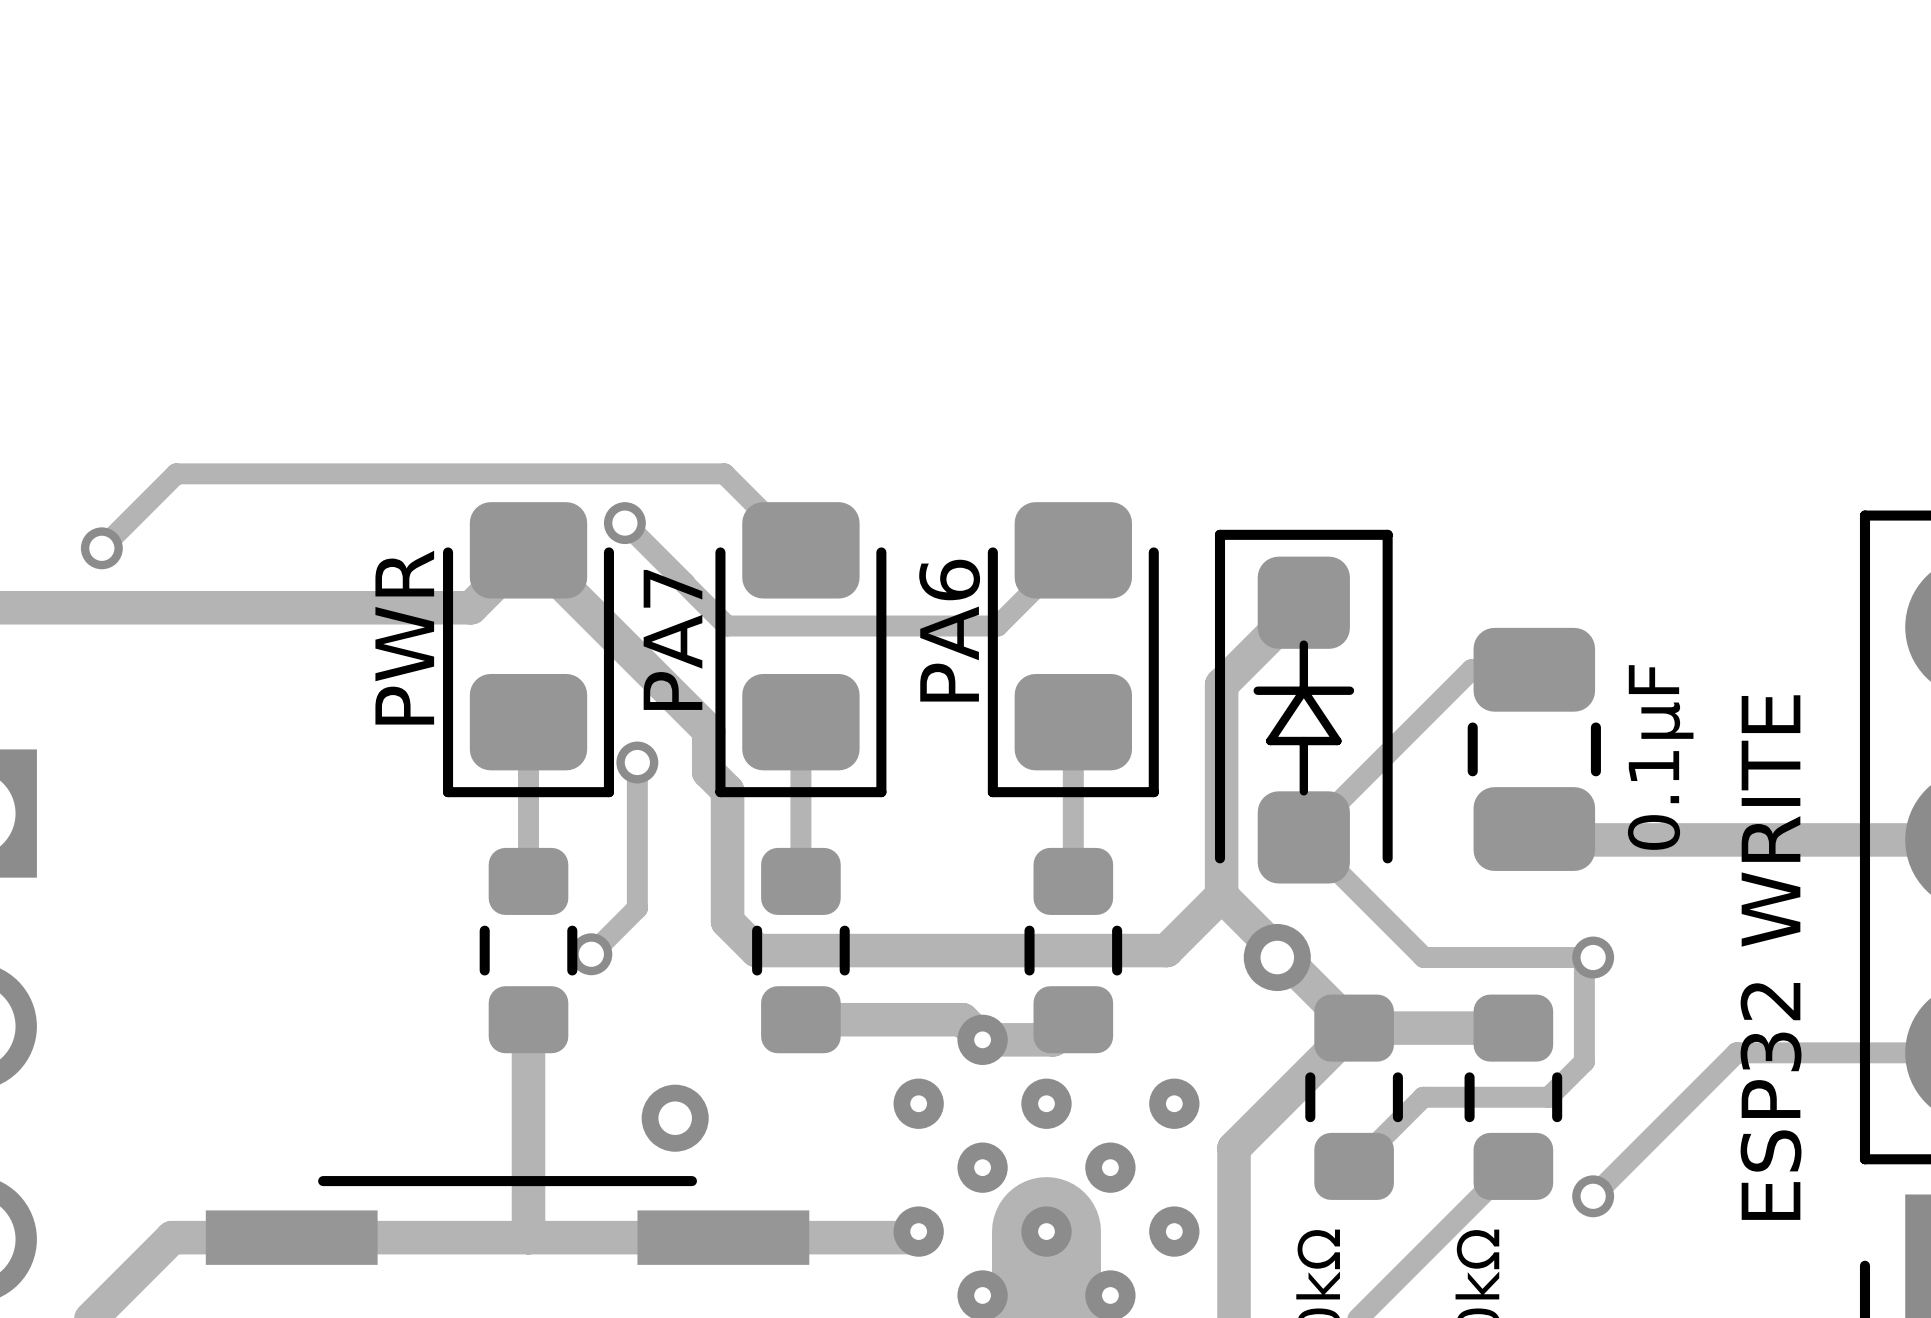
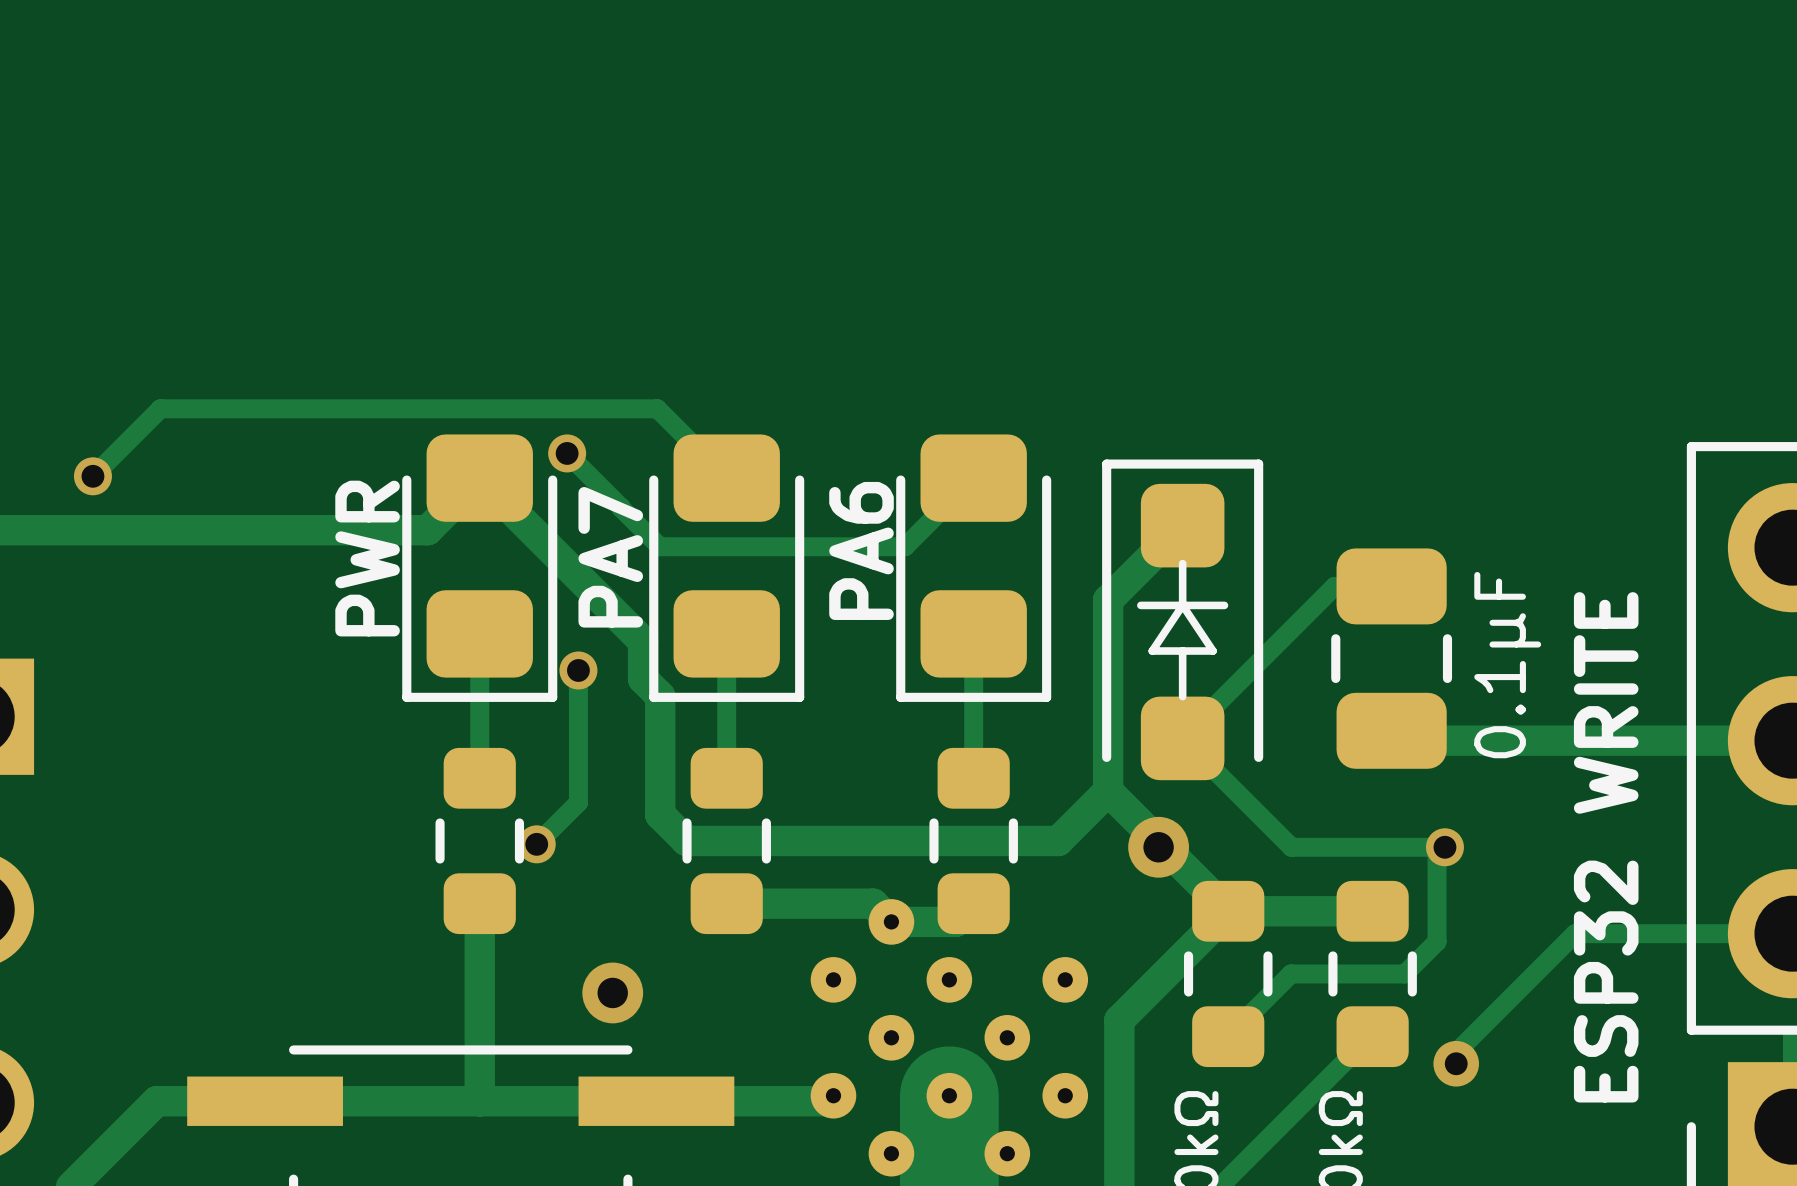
via size: [1572, 1175, 1615, 1218] -> [1433, 1040, 1480, 1087]

